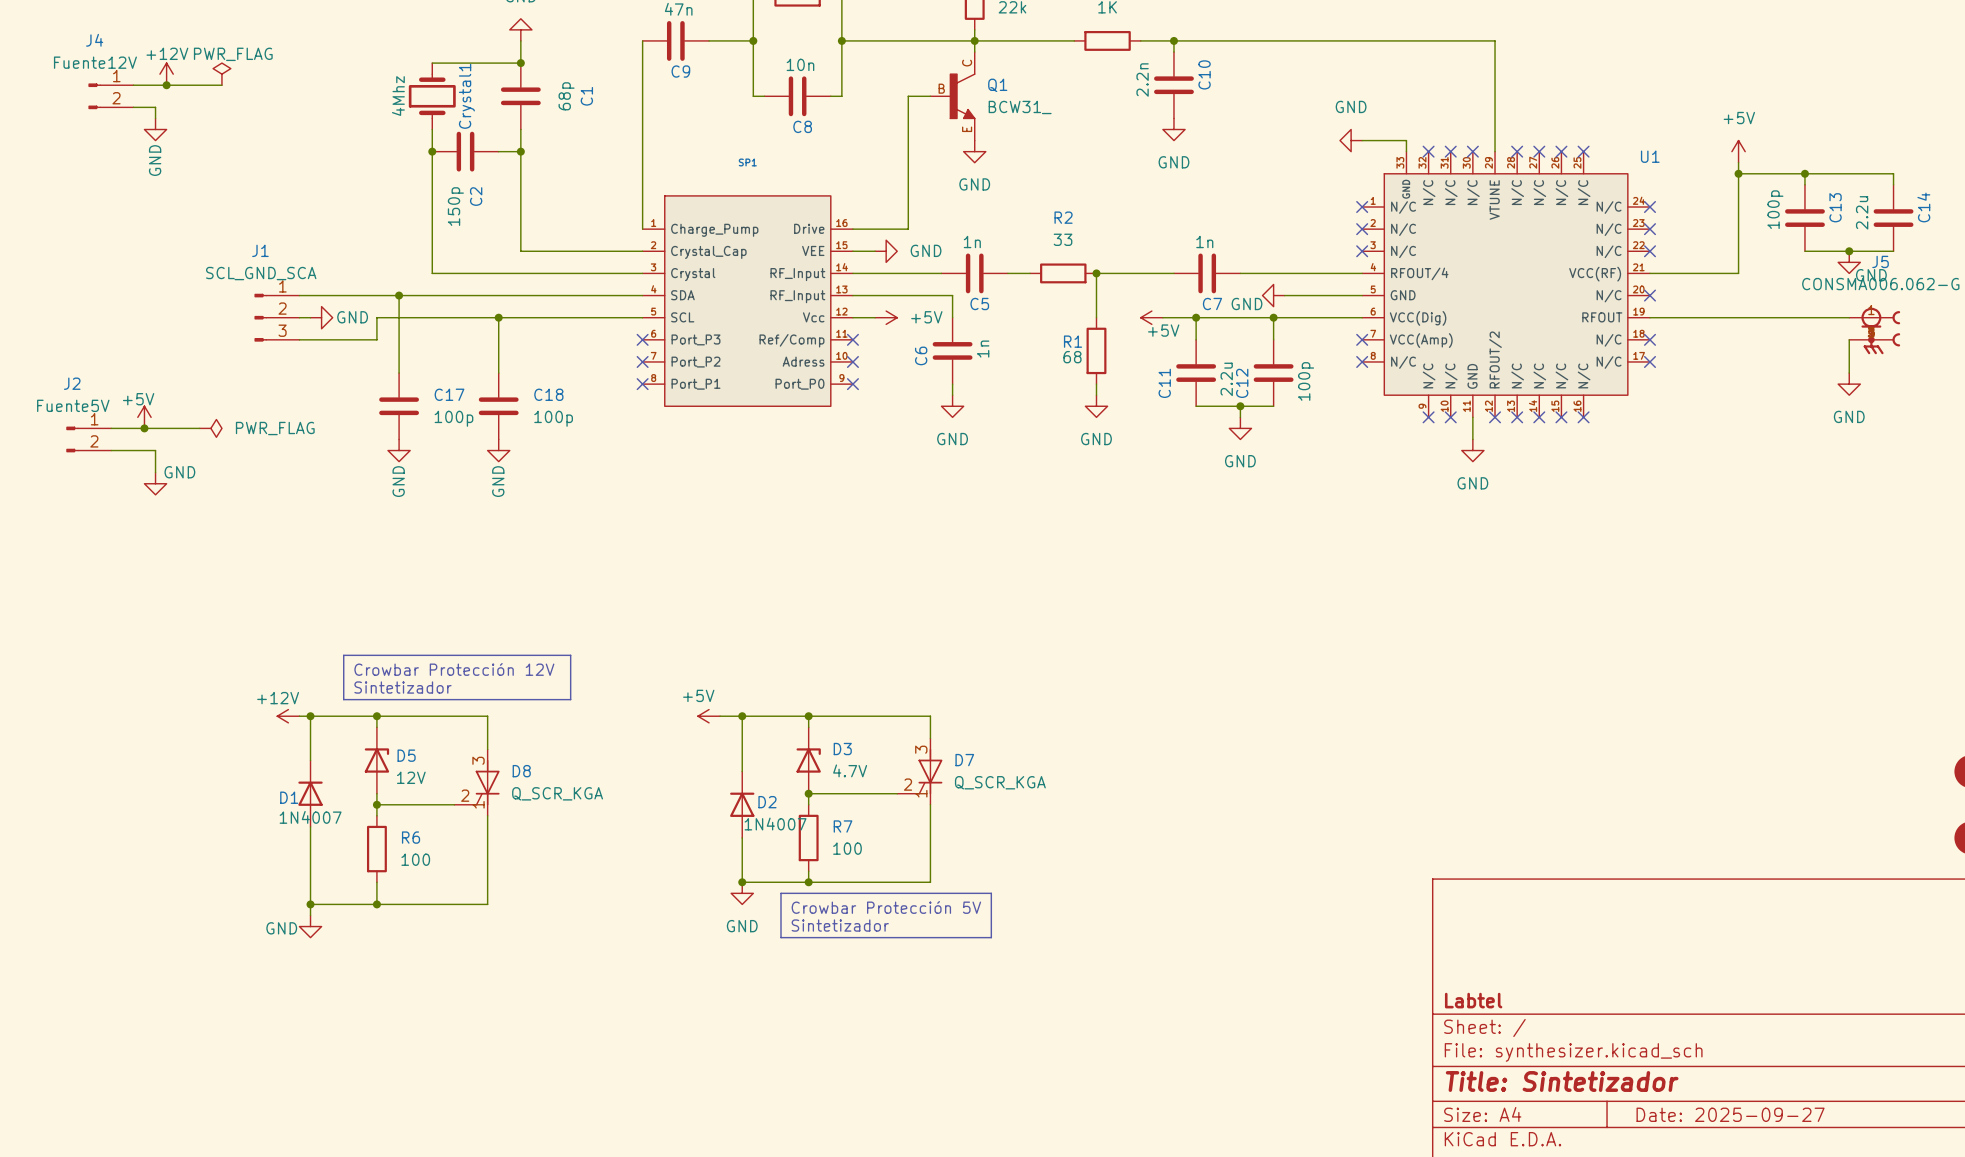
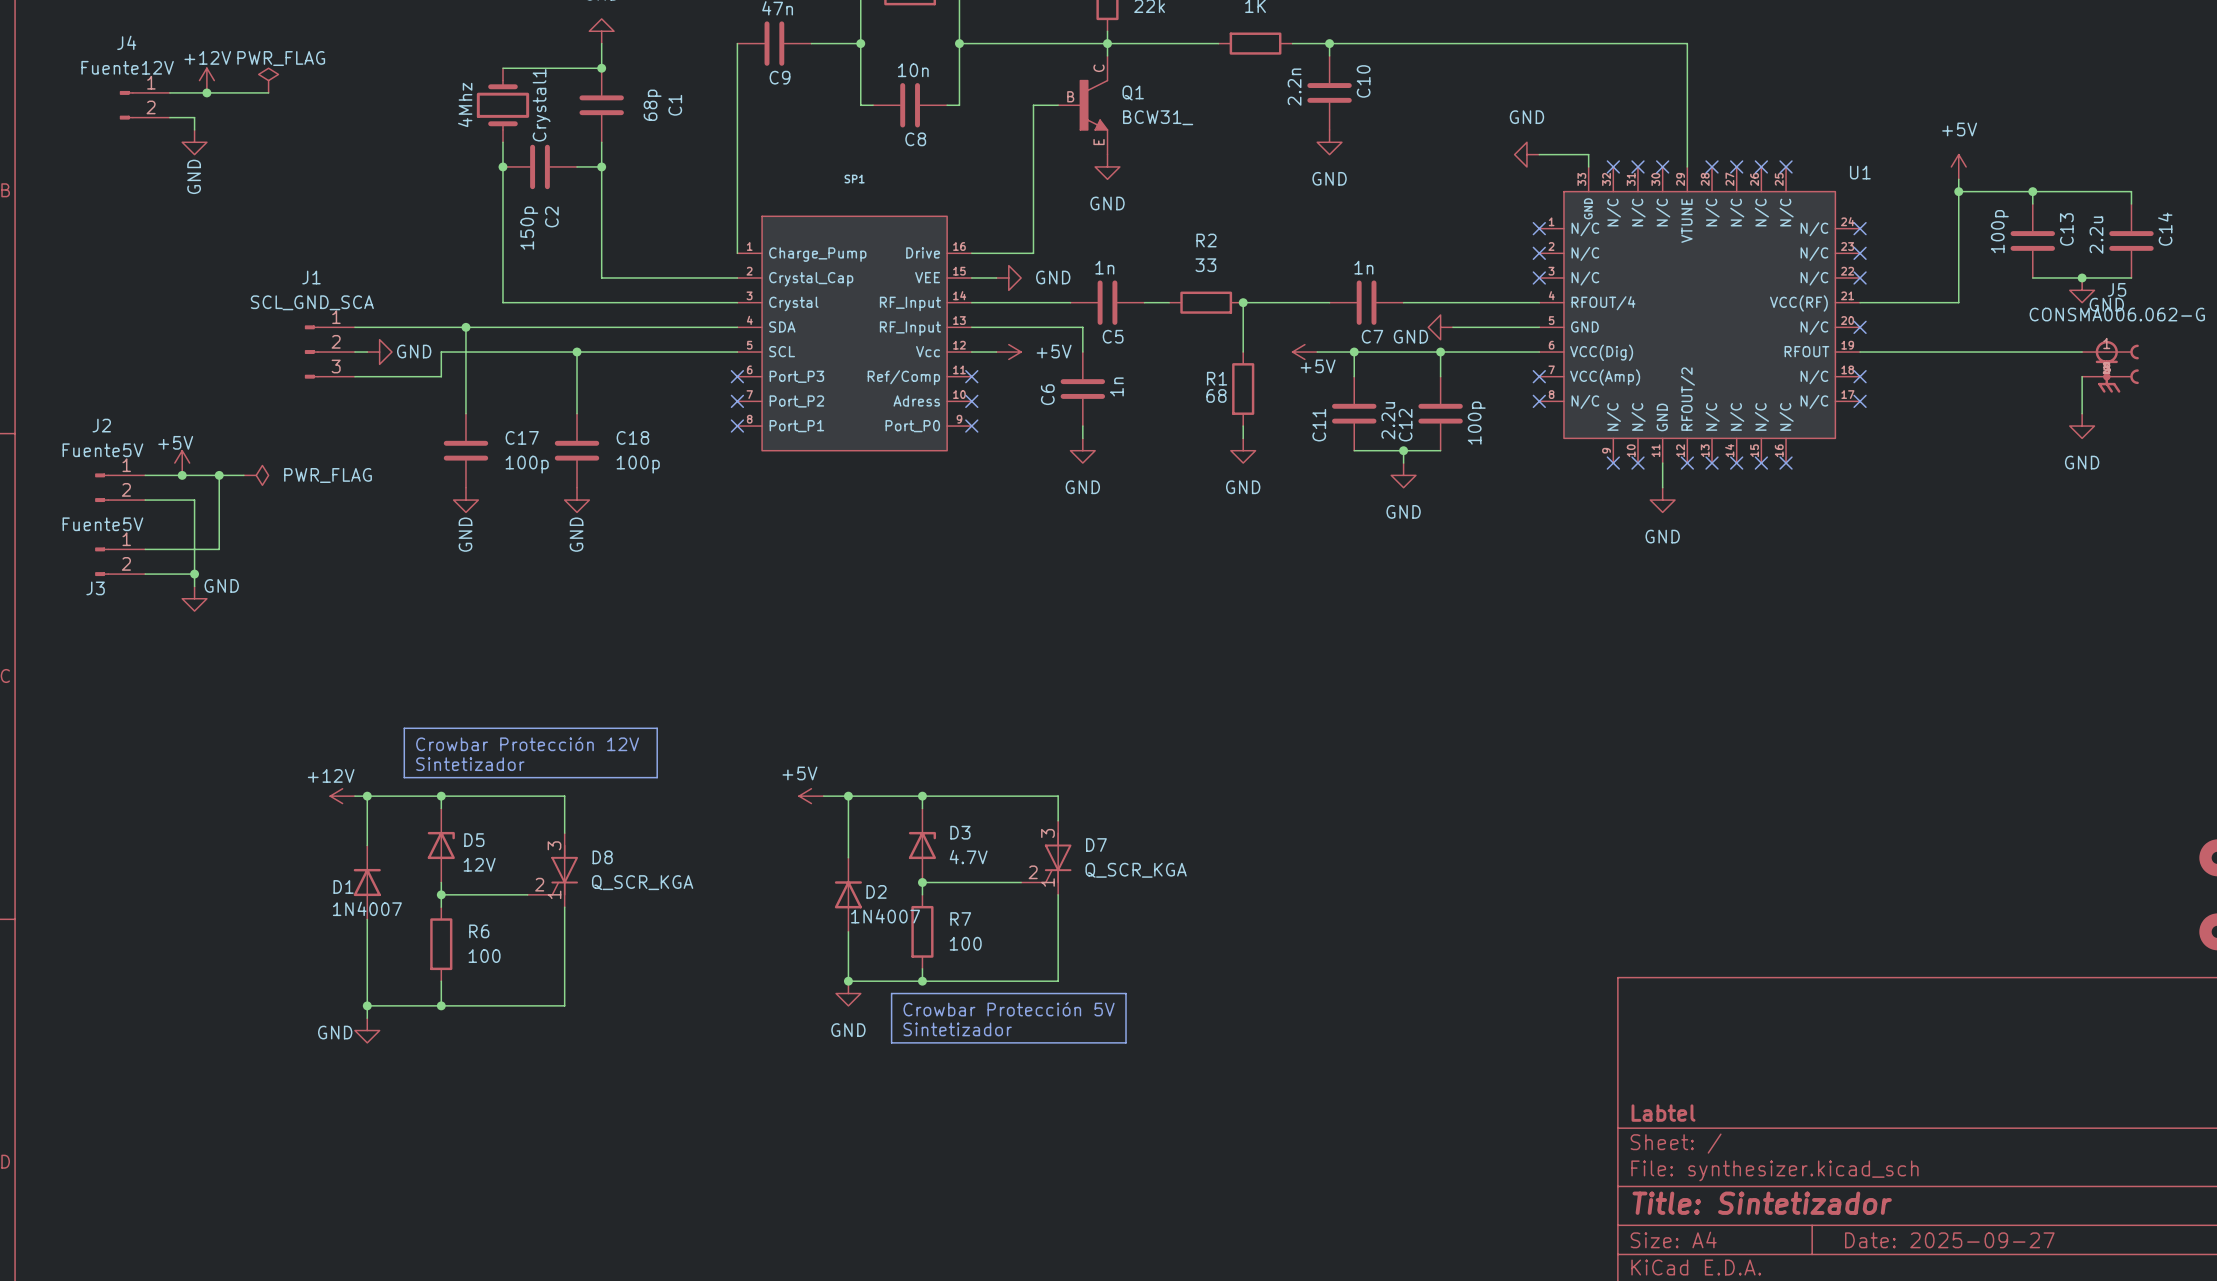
wire: none -> (219, 475) (219, 549) (145, 549)
junction: none -> (219, 475)
wire: none -> (194, 524) (194, 586)
power symbol position: GND (155, 483) -> GND (194, 598)
J3: none -> Fuente5V (120, 561)
wire: none -> (145, 574) (194, 574)
junction: none -> (194, 574)

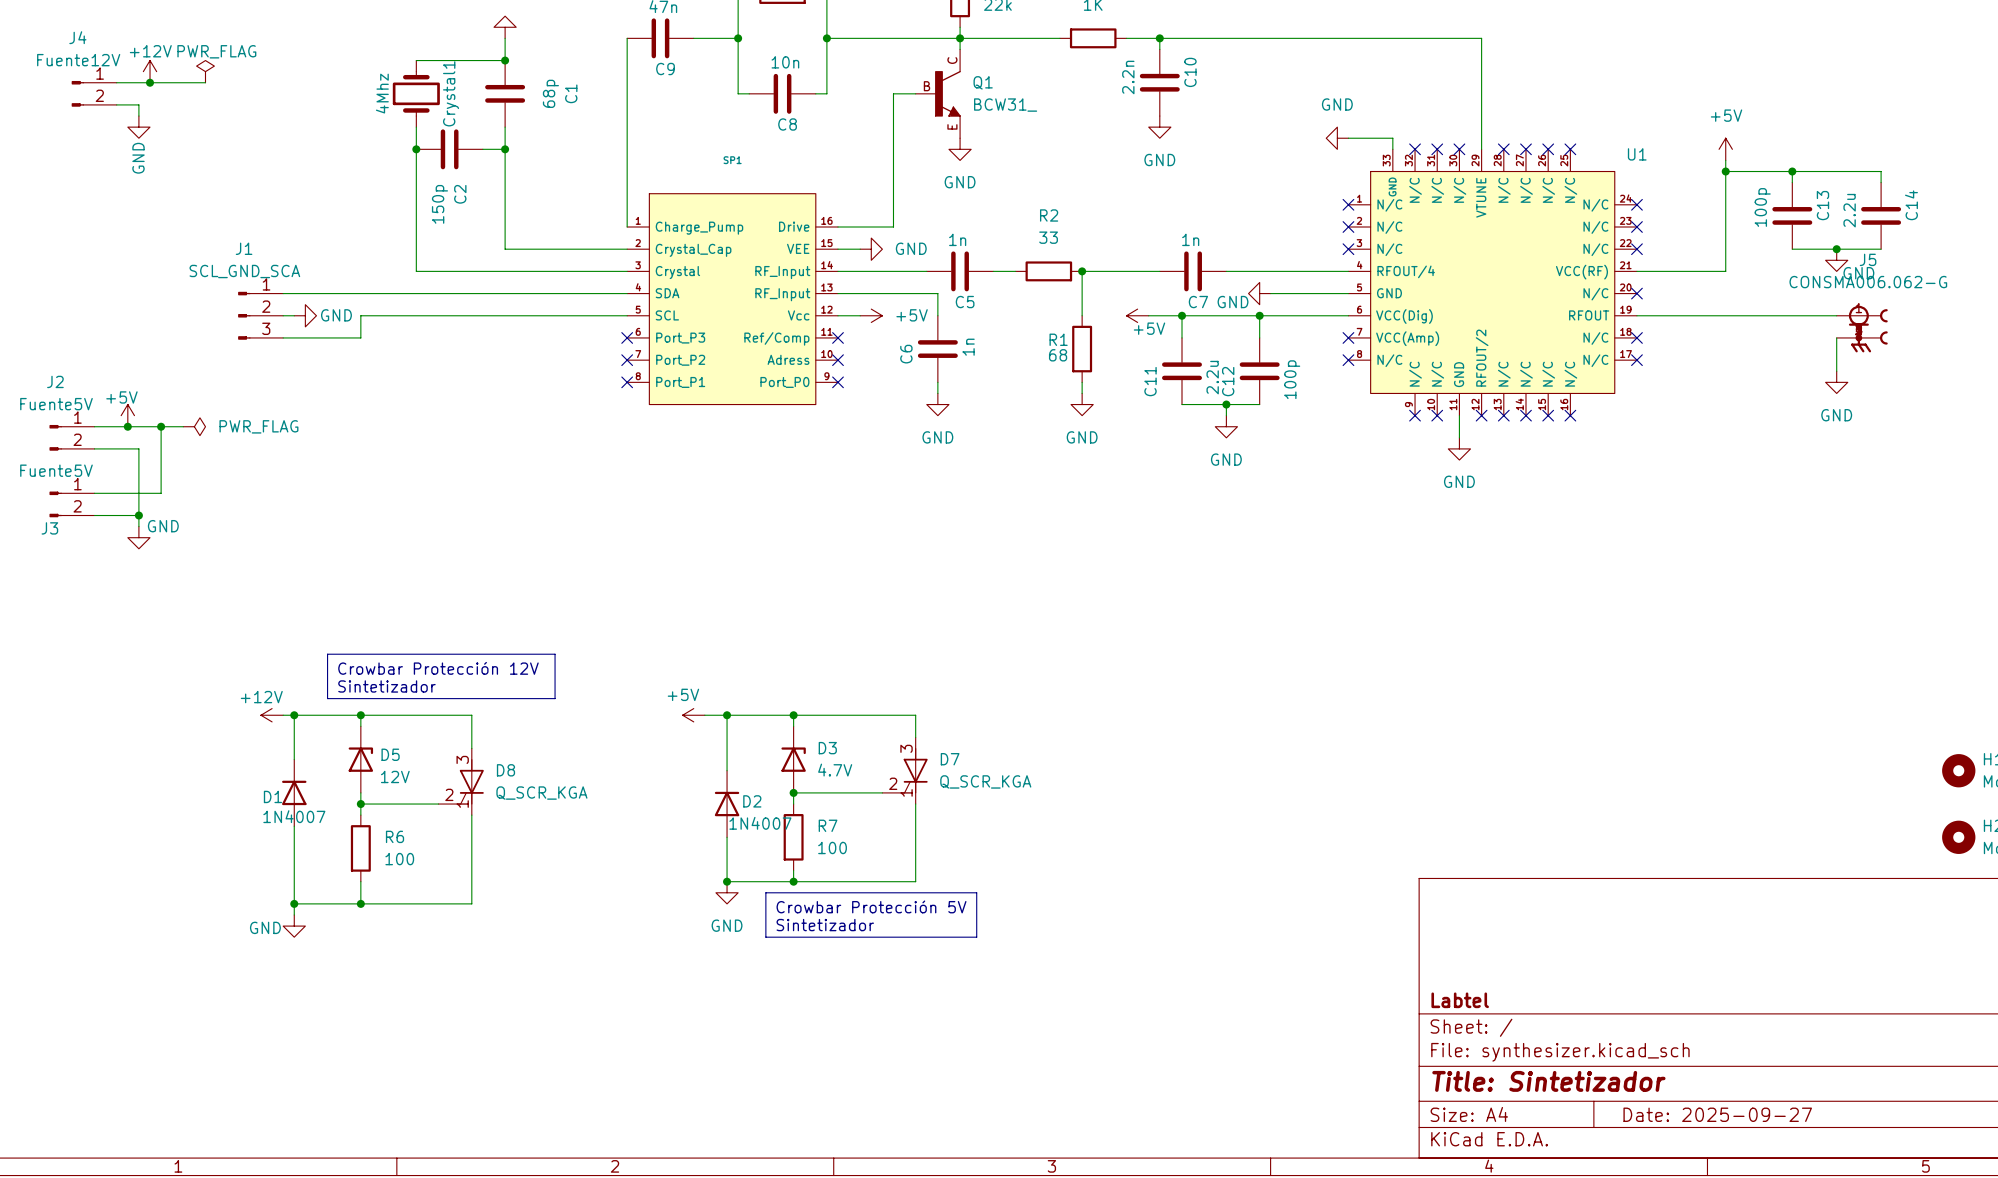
wire: (465, 327) (465, 413) -> none
junction: (465, 327) -> none
wire: (577, 352) (577, 413) -> none
junction: (577, 352) -> none
C17: 100p (465, 450) -> none
C18: 100p (577, 450) -> none
power symbol: GND (465, 500) -> none
power symbol: GND (577, 500) -> none

